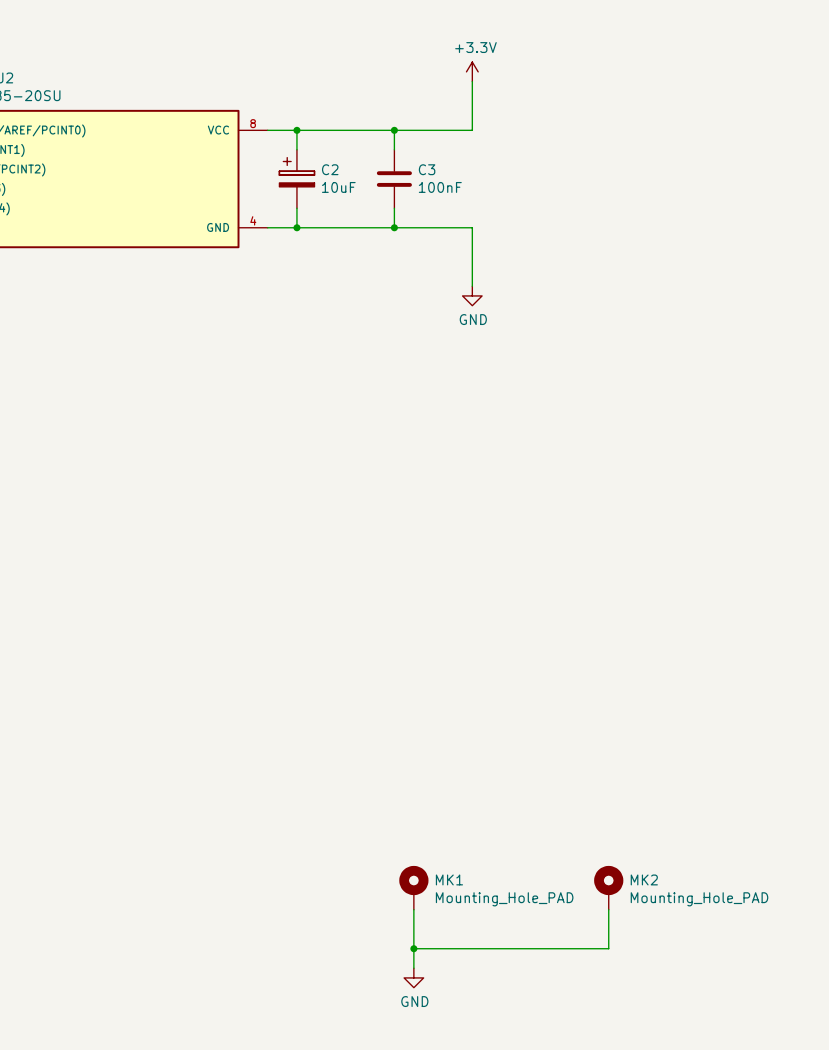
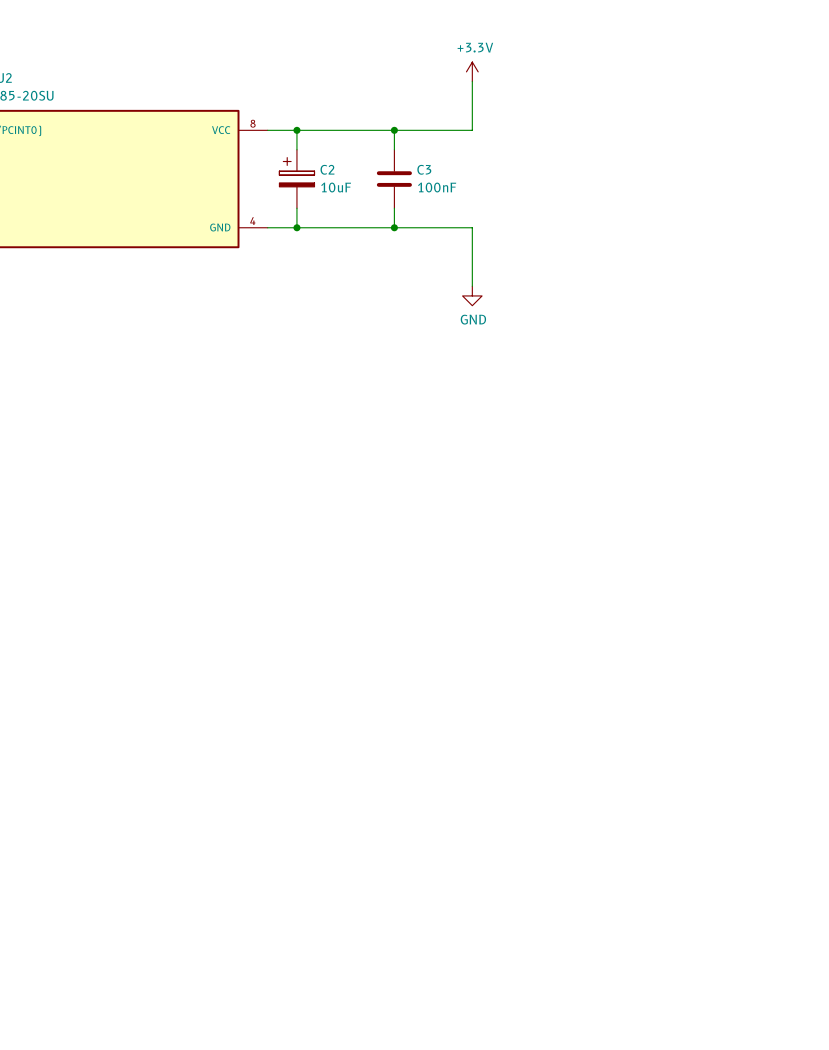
MK1: Mounting_Hole_PAD (413, 887) -> none
MK2: Mounting_Hole_PAD (608, 887) -> none
wire: (413, 909) (413, 968) -> none
wire: (608, 909) (608, 948) (413, 948) -> none
junction: (413, 948) -> none
power symbol: GND (413, 977) -> none

